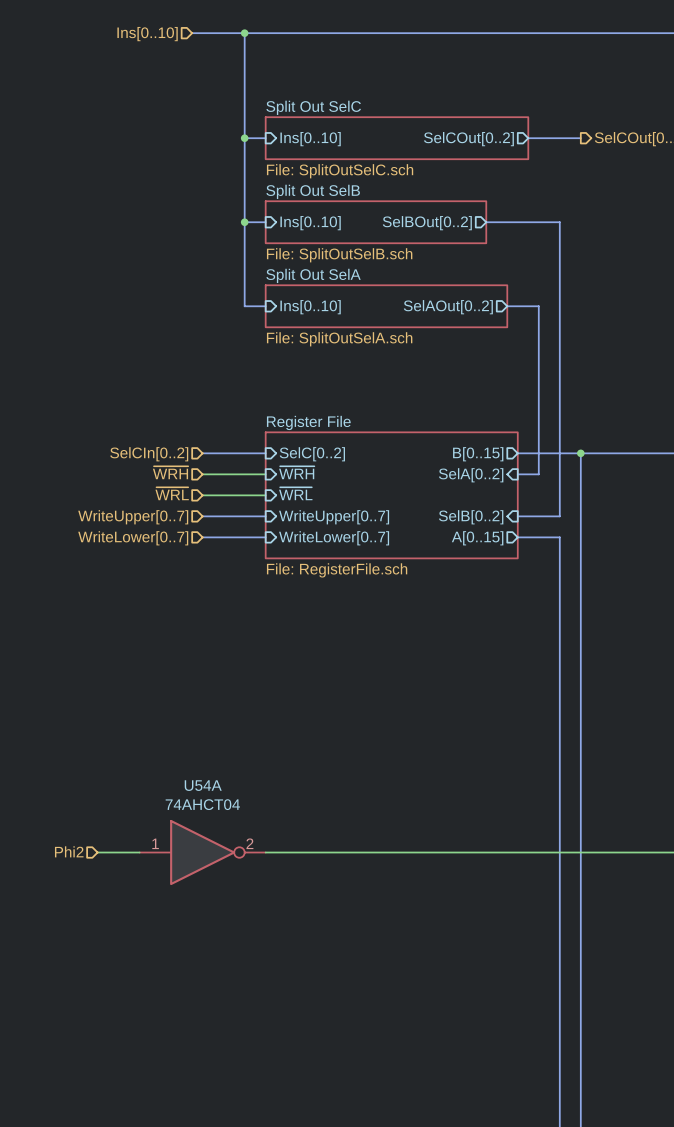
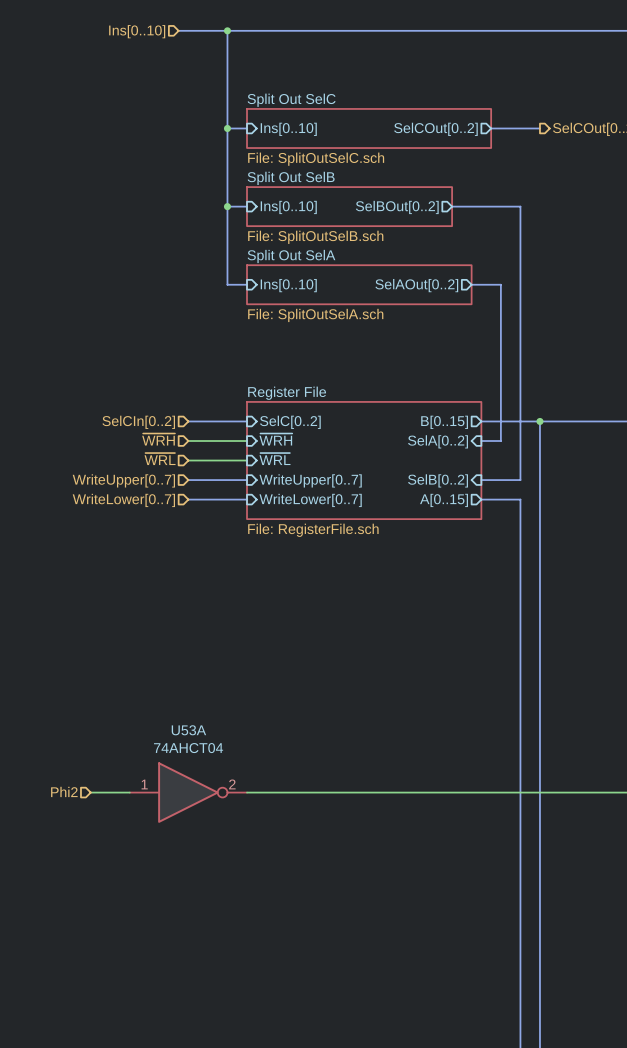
U54A name: U54A (203, 785) -> U53A (188, 730)

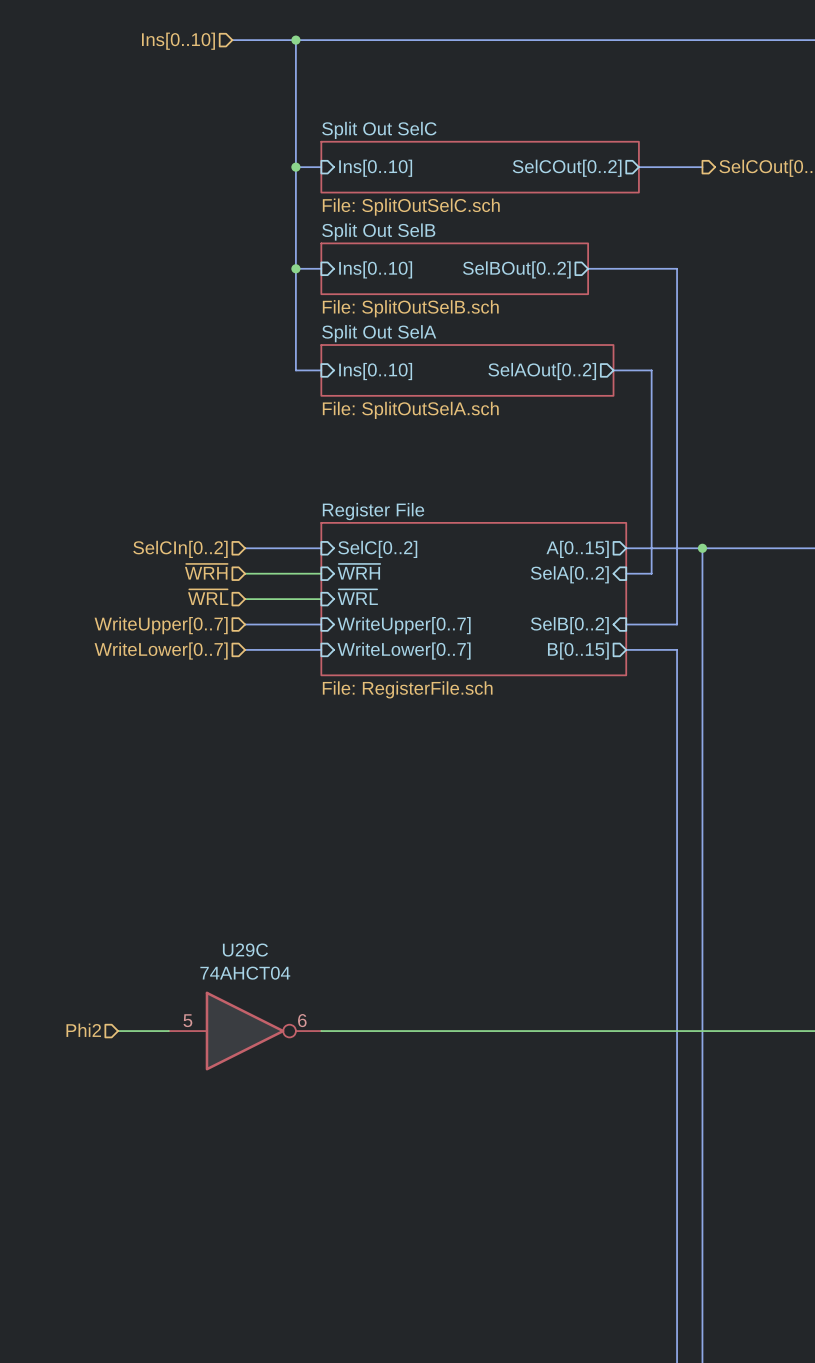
sheet pin: B[0..15] (444, 422) -> A[0..15] (577, 549)
sheet pin: A[0..15] (444, 500) -> B[0..15] (578, 651)
U53A name: U53A (188, 730) -> U29C (245, 950)
U53A pin number: 1 (144, 784) -> 5 (187, 1020)
U53A pin number: 2 (232, 784) -> 6 (302, 1020)

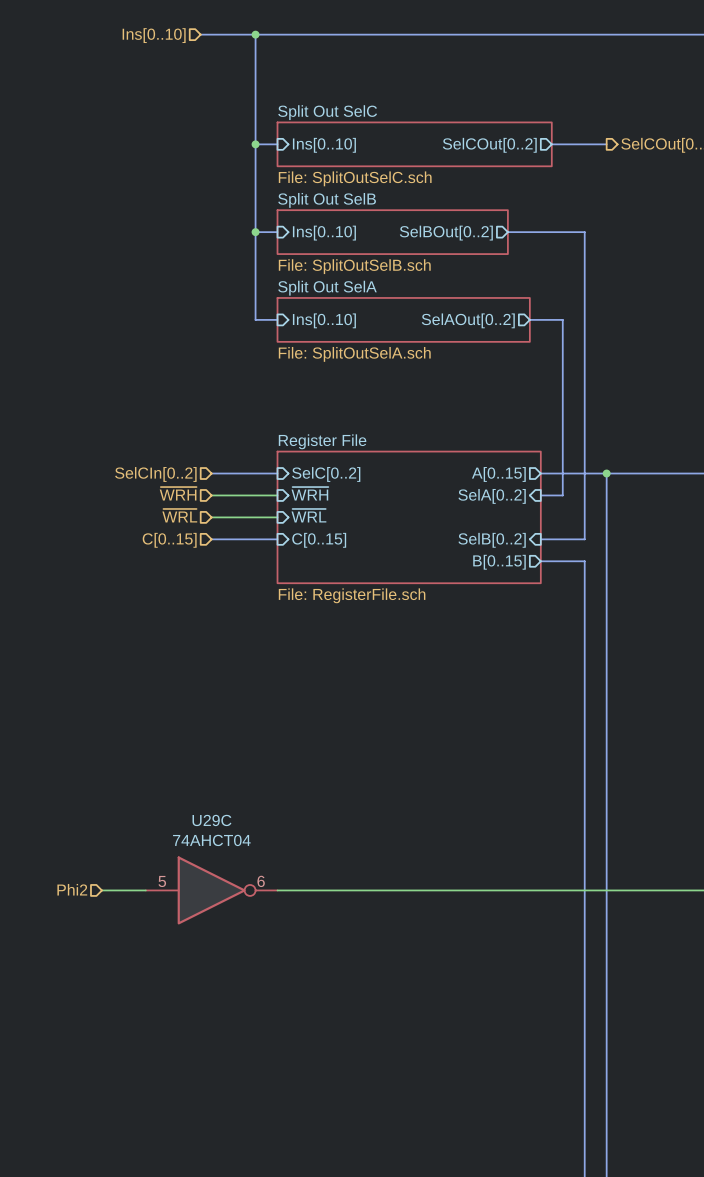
hierarchical label: WriteUpper[0..7] (161, 625) -> C[0..15] (169, 540)
sheet pin: WriteUpper[0..7] (404, 625) -> C[0..15] (319, 540)
bus: (245, 649) (321, 649) -> none
hierarchical label: WriteLower[0..7] (161, 651) -> none
sheet pin: WriteLower[0..7] (404, 651) -> none

